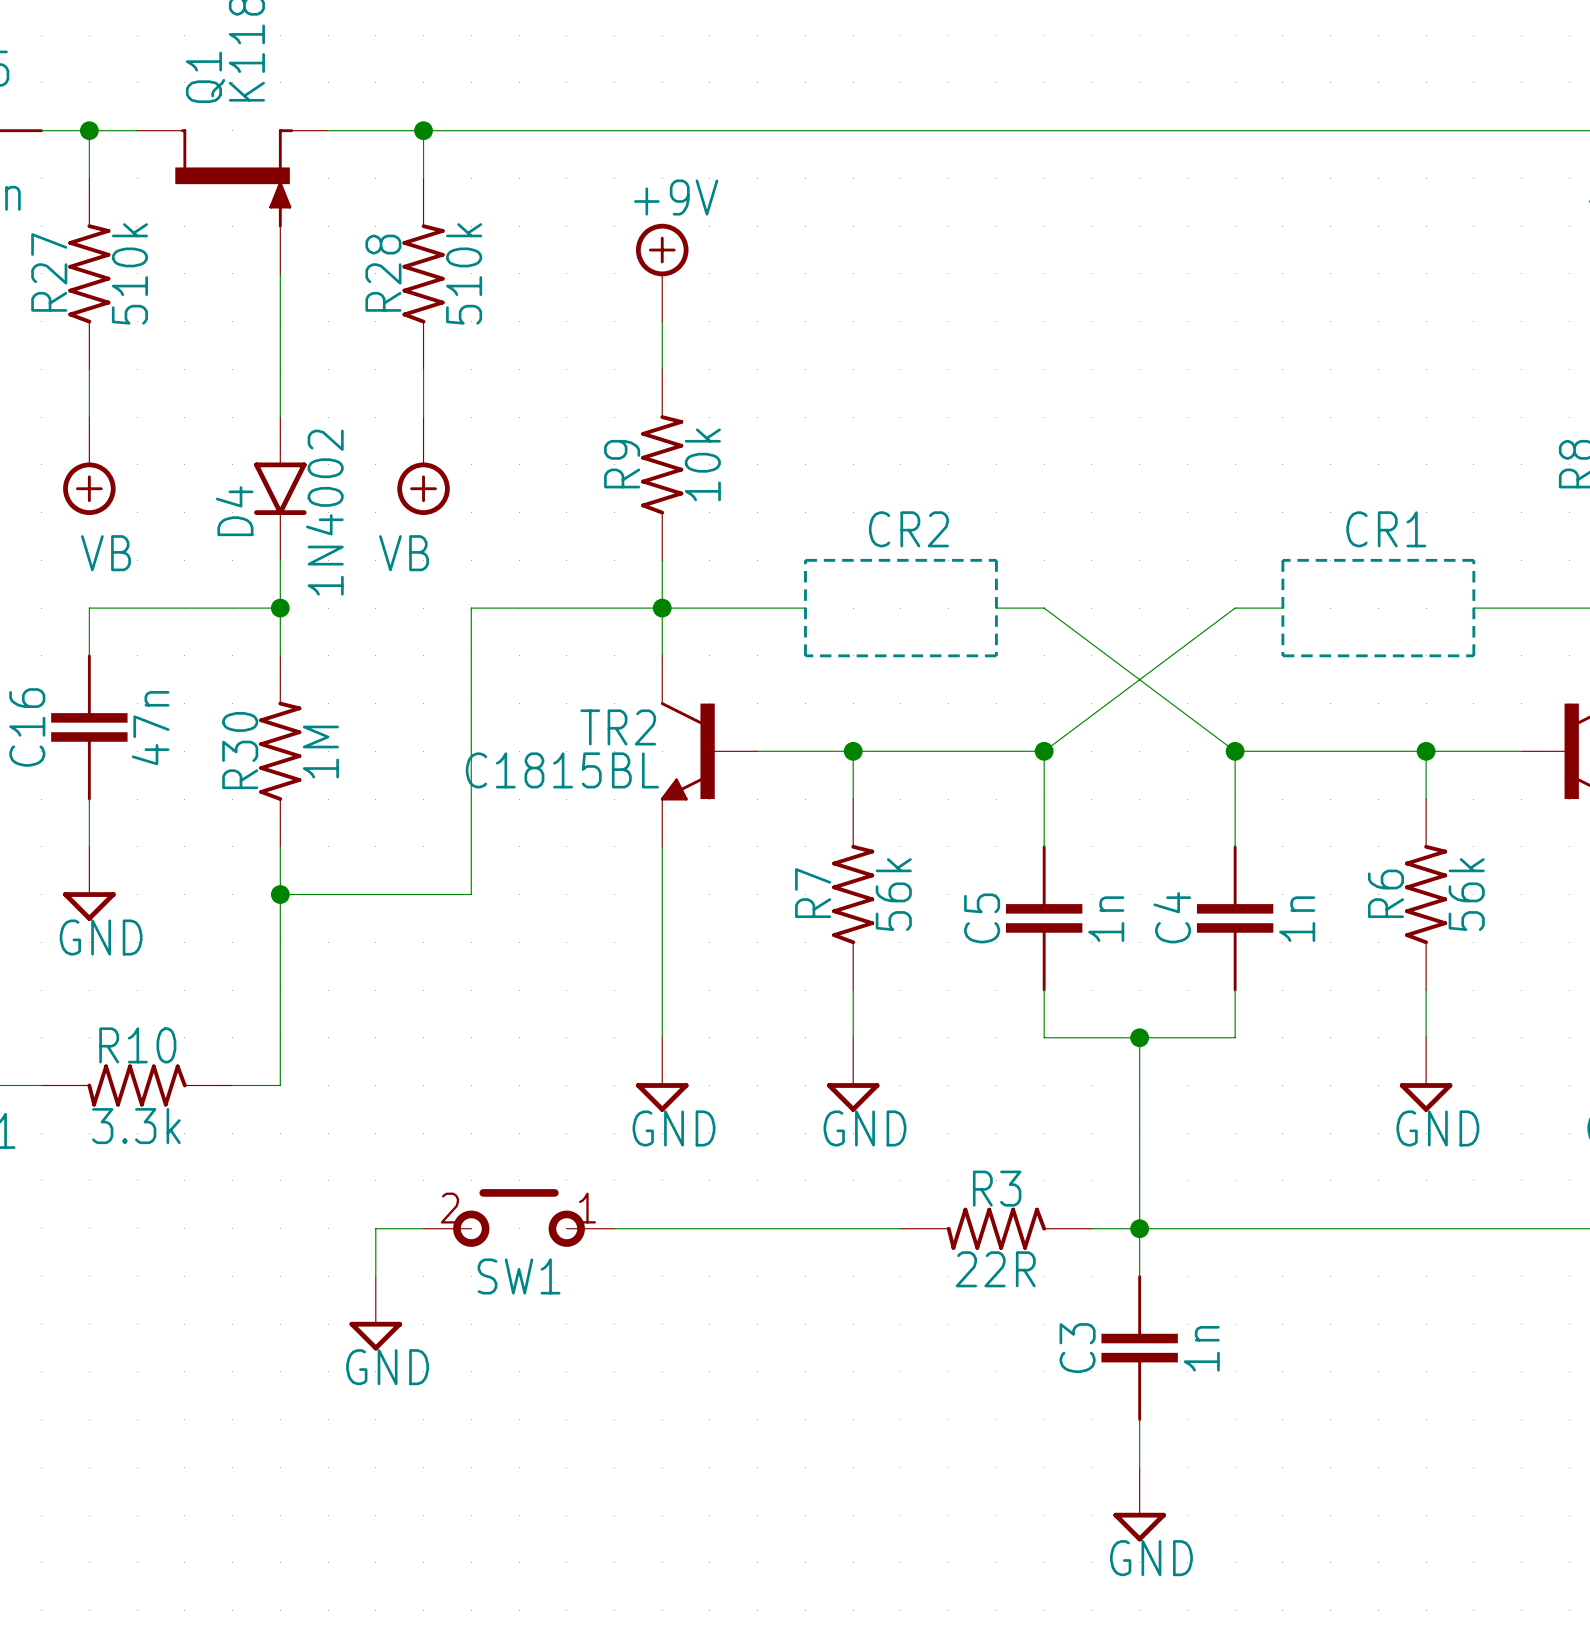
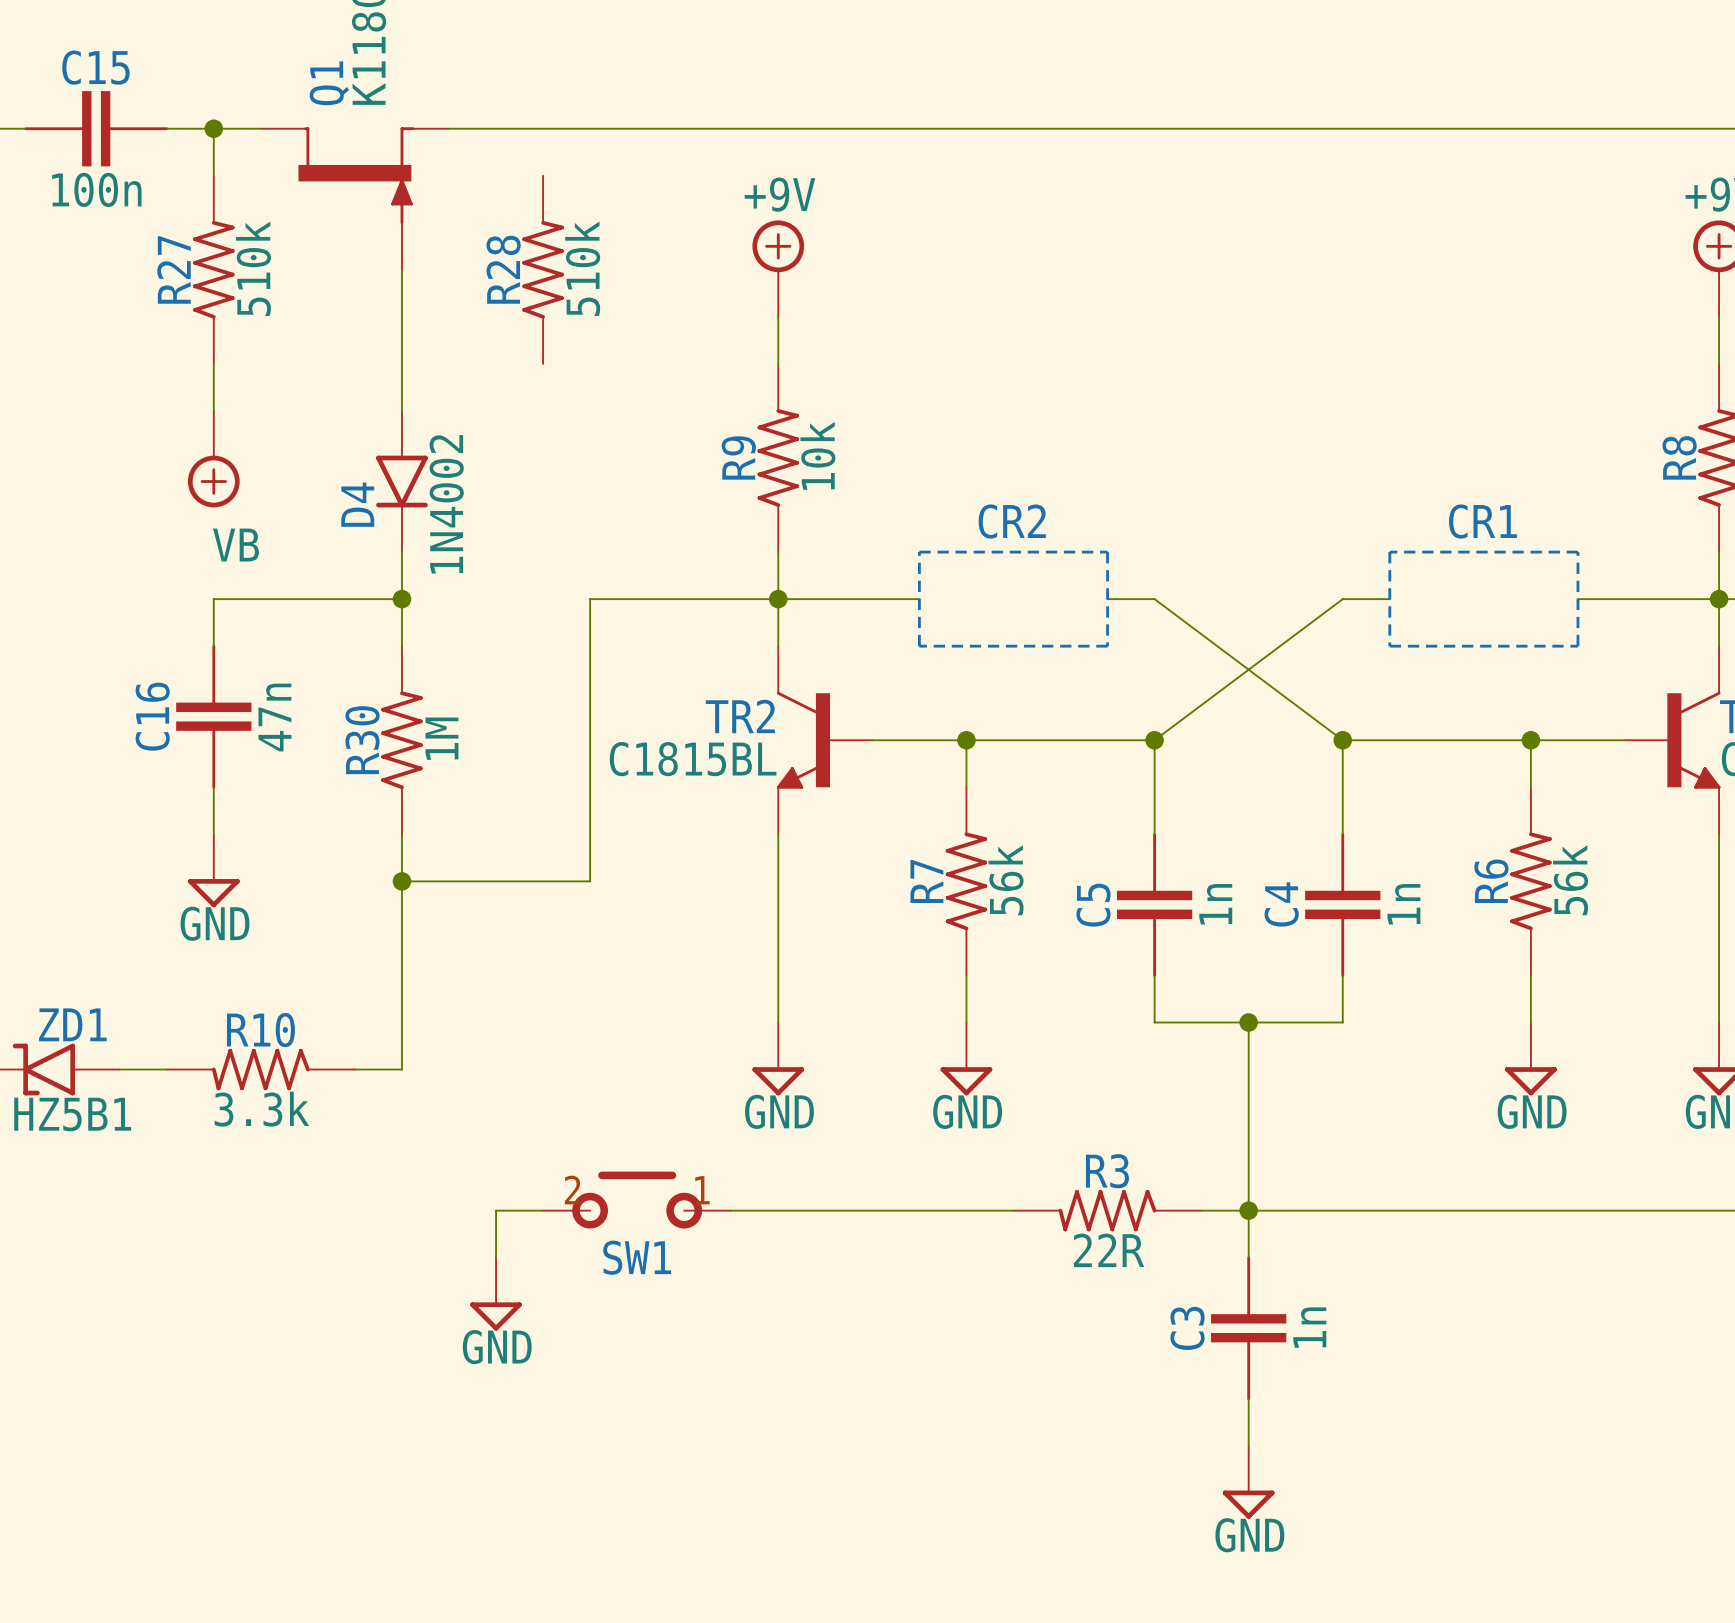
wire: (423, 130) (423, 178) -> none
junction: (423, 130) -> none
wire: (423, 369) (423, 417) -> none
power symbol: VB (423, 466) -> none

